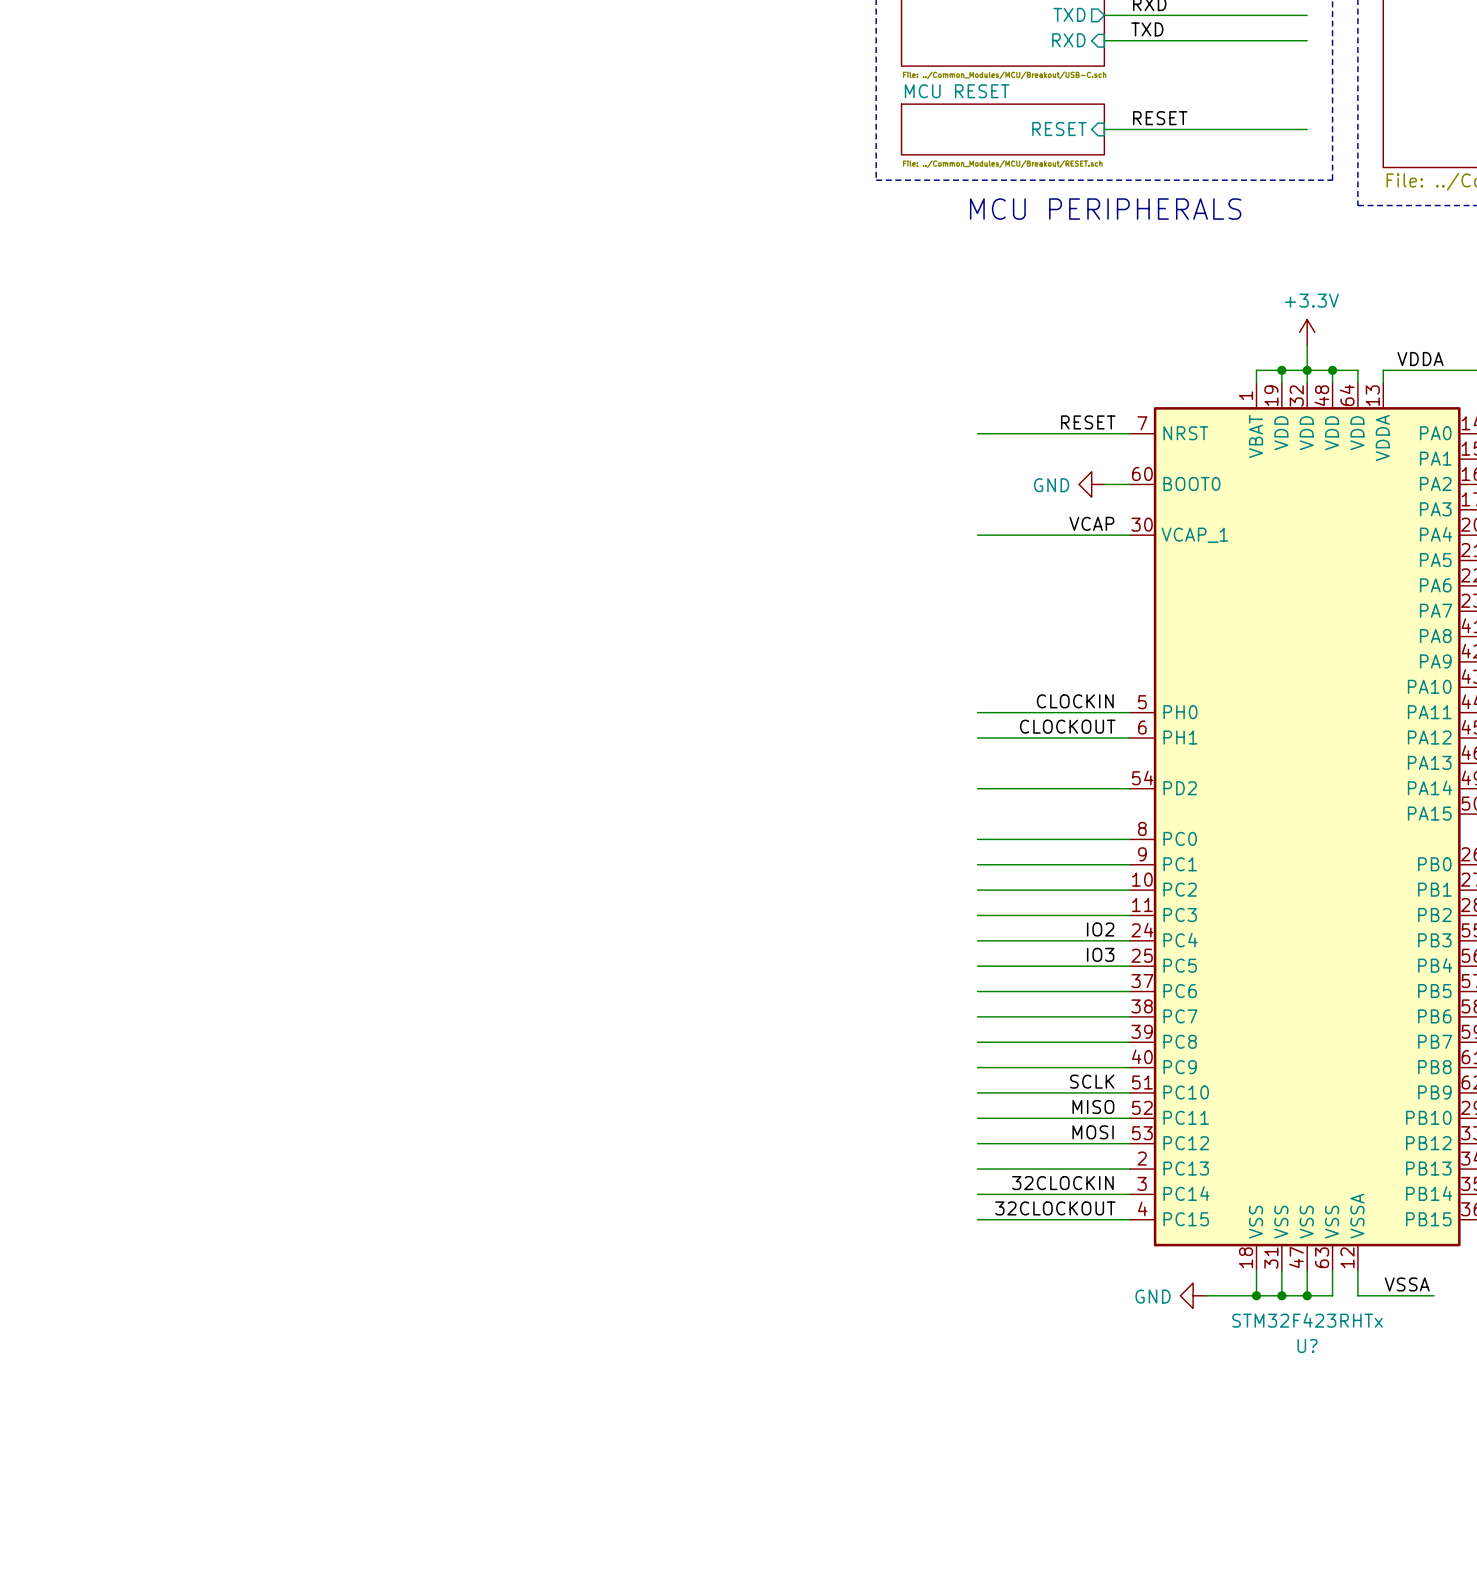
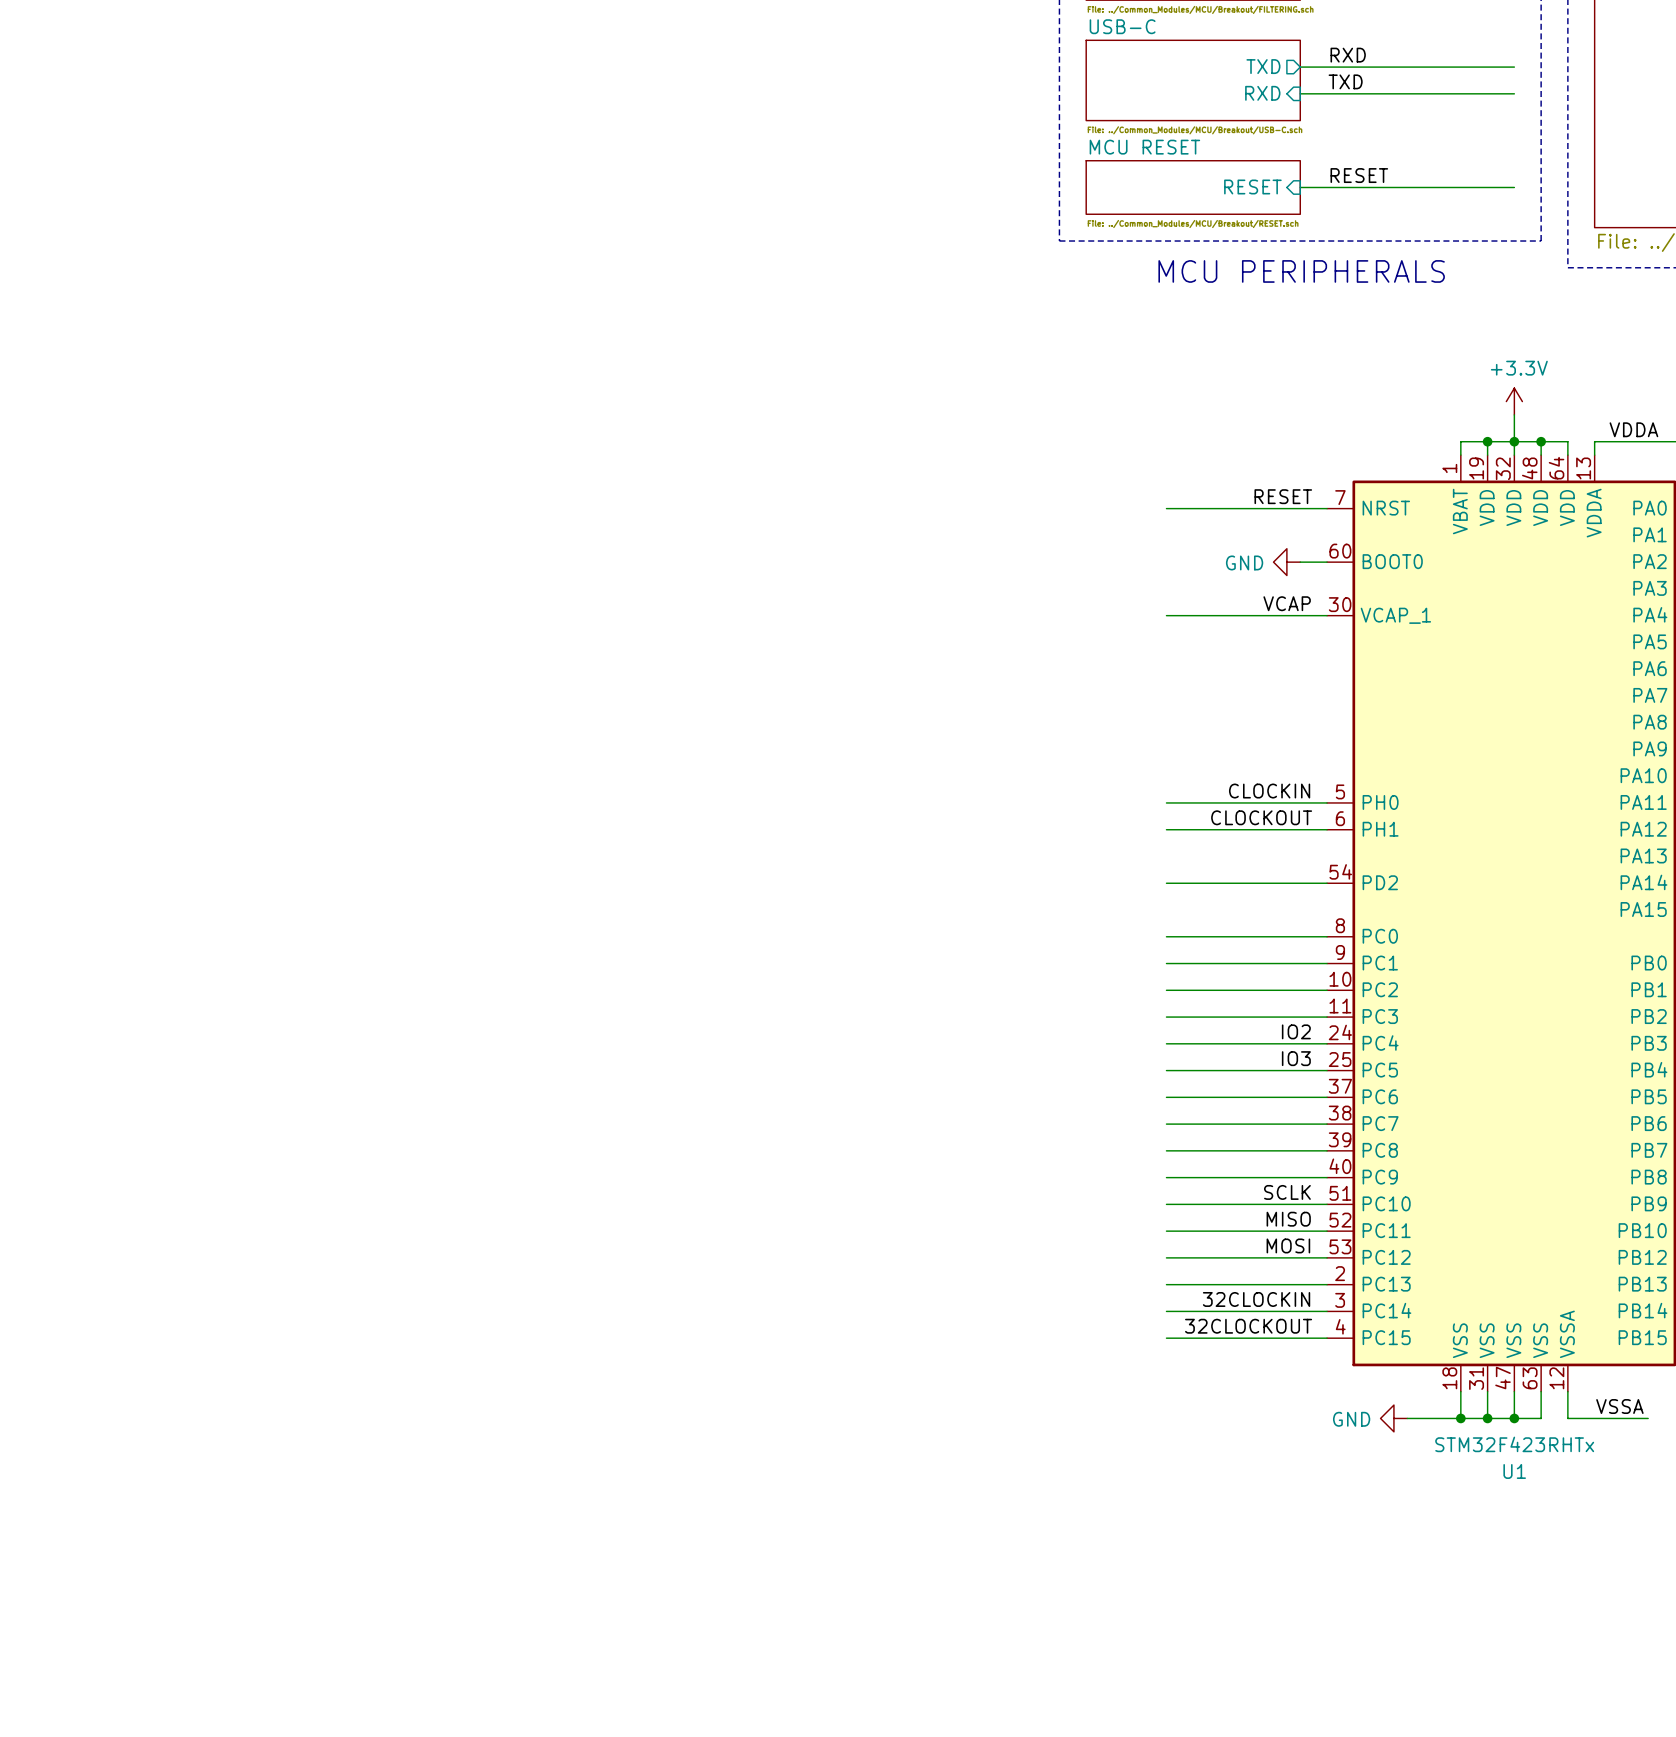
U? name: U? (1307, 1346) -> U1 (1514, 1471)

